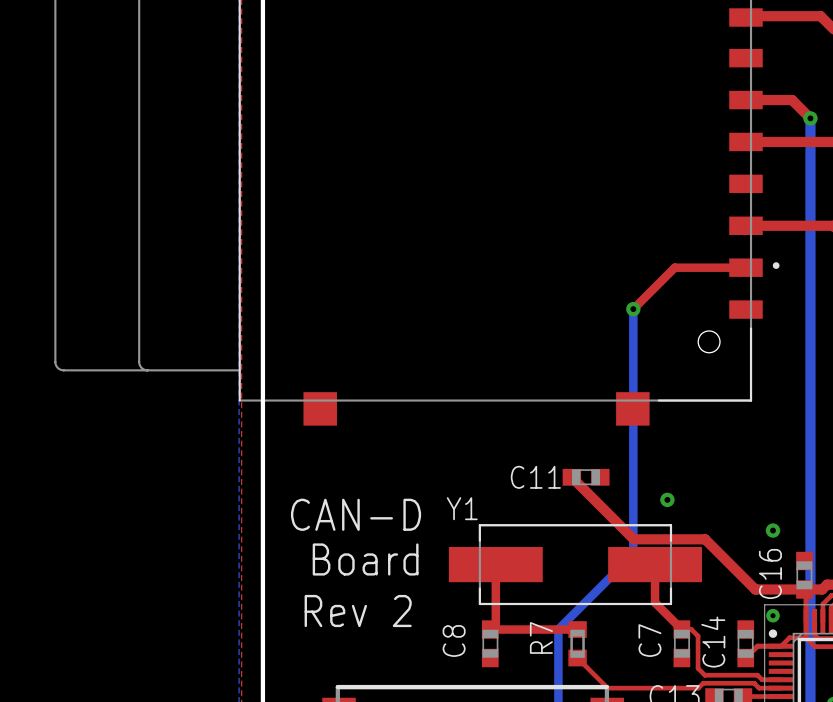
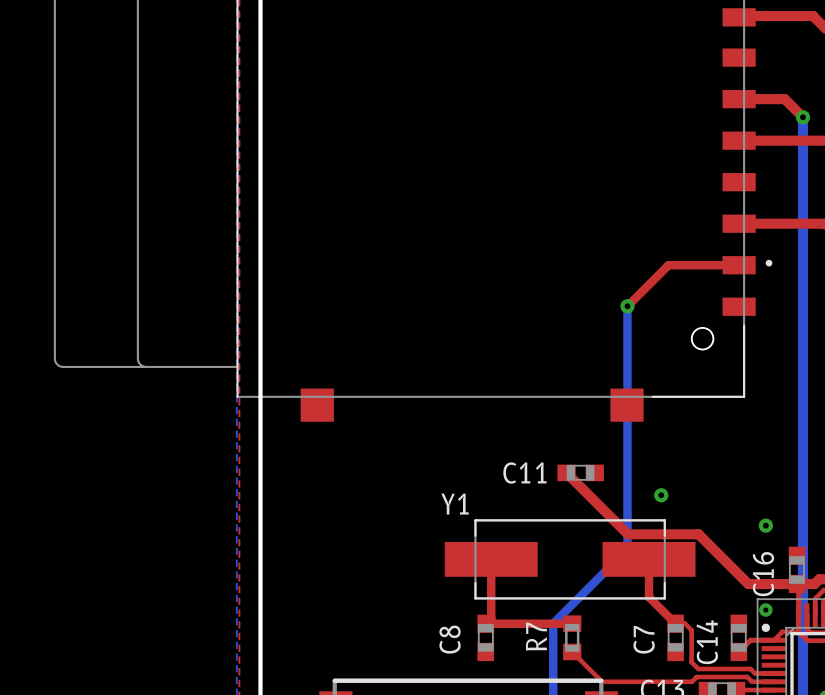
text: CAN-D (356, 514) -> none
text: Board (365, 559) -> none
text: Rev 2 (358, 611) -> none

